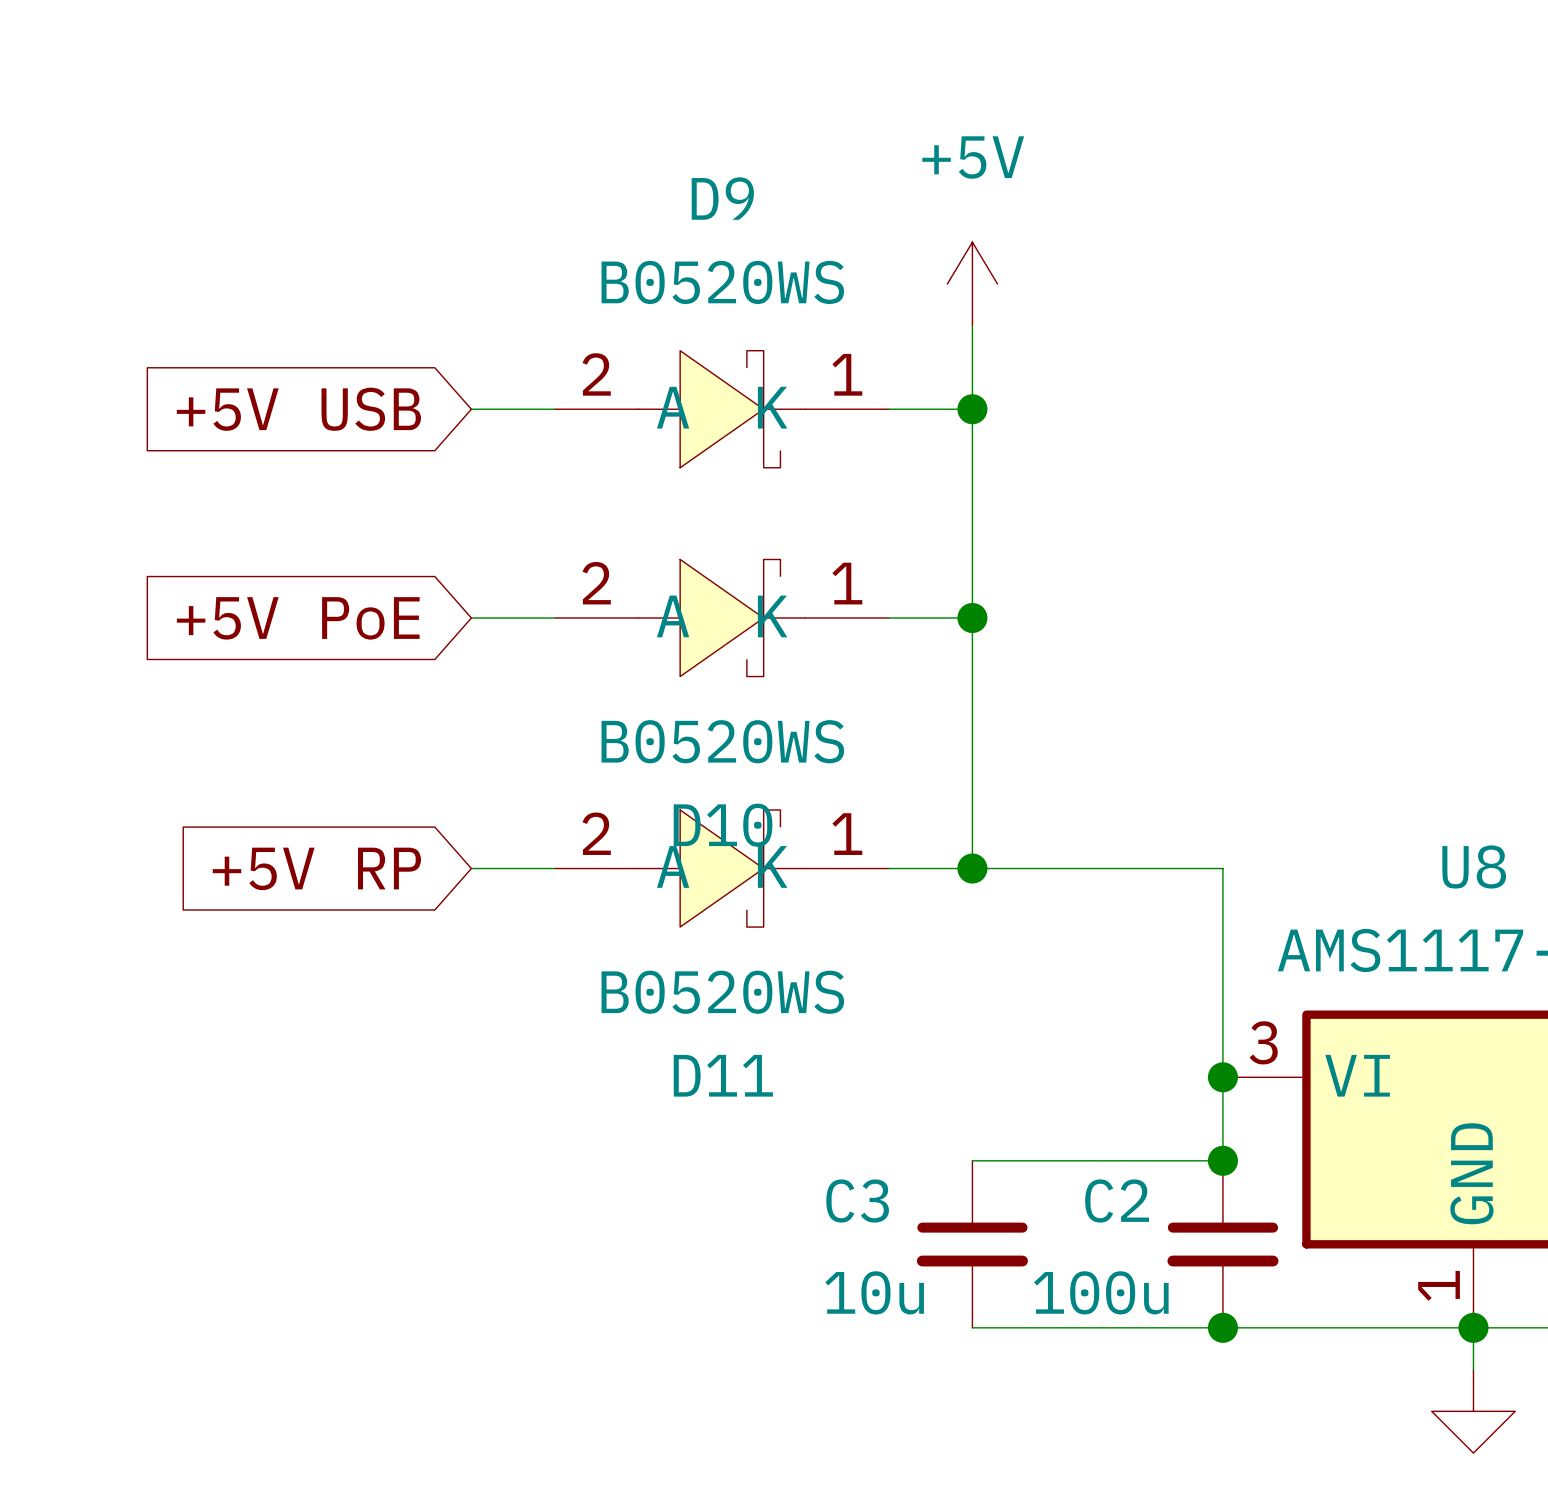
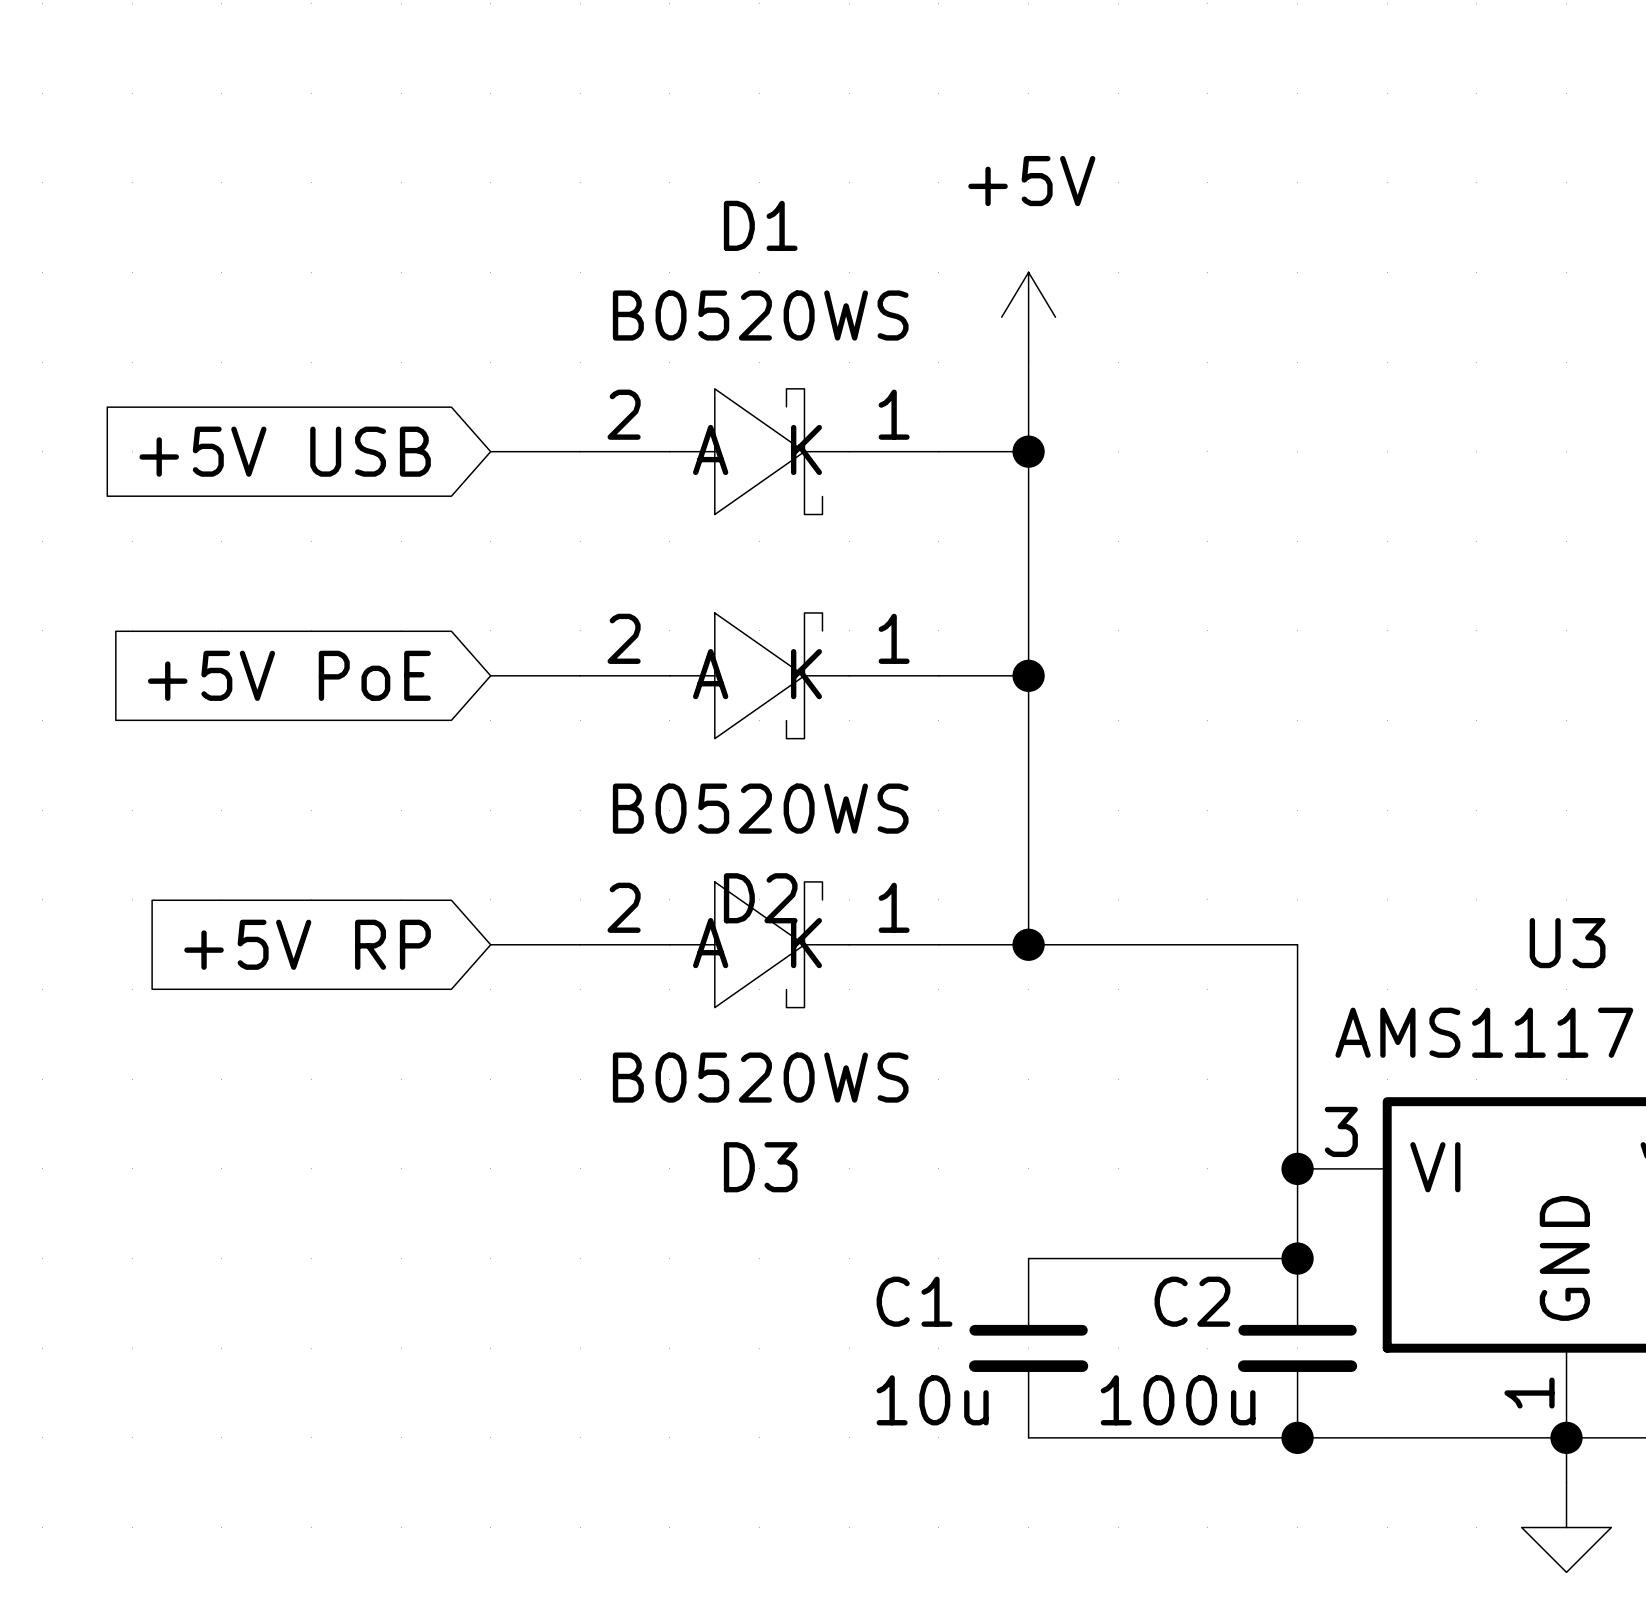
D9 name: D9 (722, 198) -> D1 (760, 225)
D10 name: D10 (723, 825) -> D2 (760, 898)
U8 name: U8 (1474, 866) -> U3 (1567, 943)
D11 name: D11 (723, 1075) -> D3 (760, 1167)
C3 name: C3 (857, 1201) -> C1 (914, 1301)

